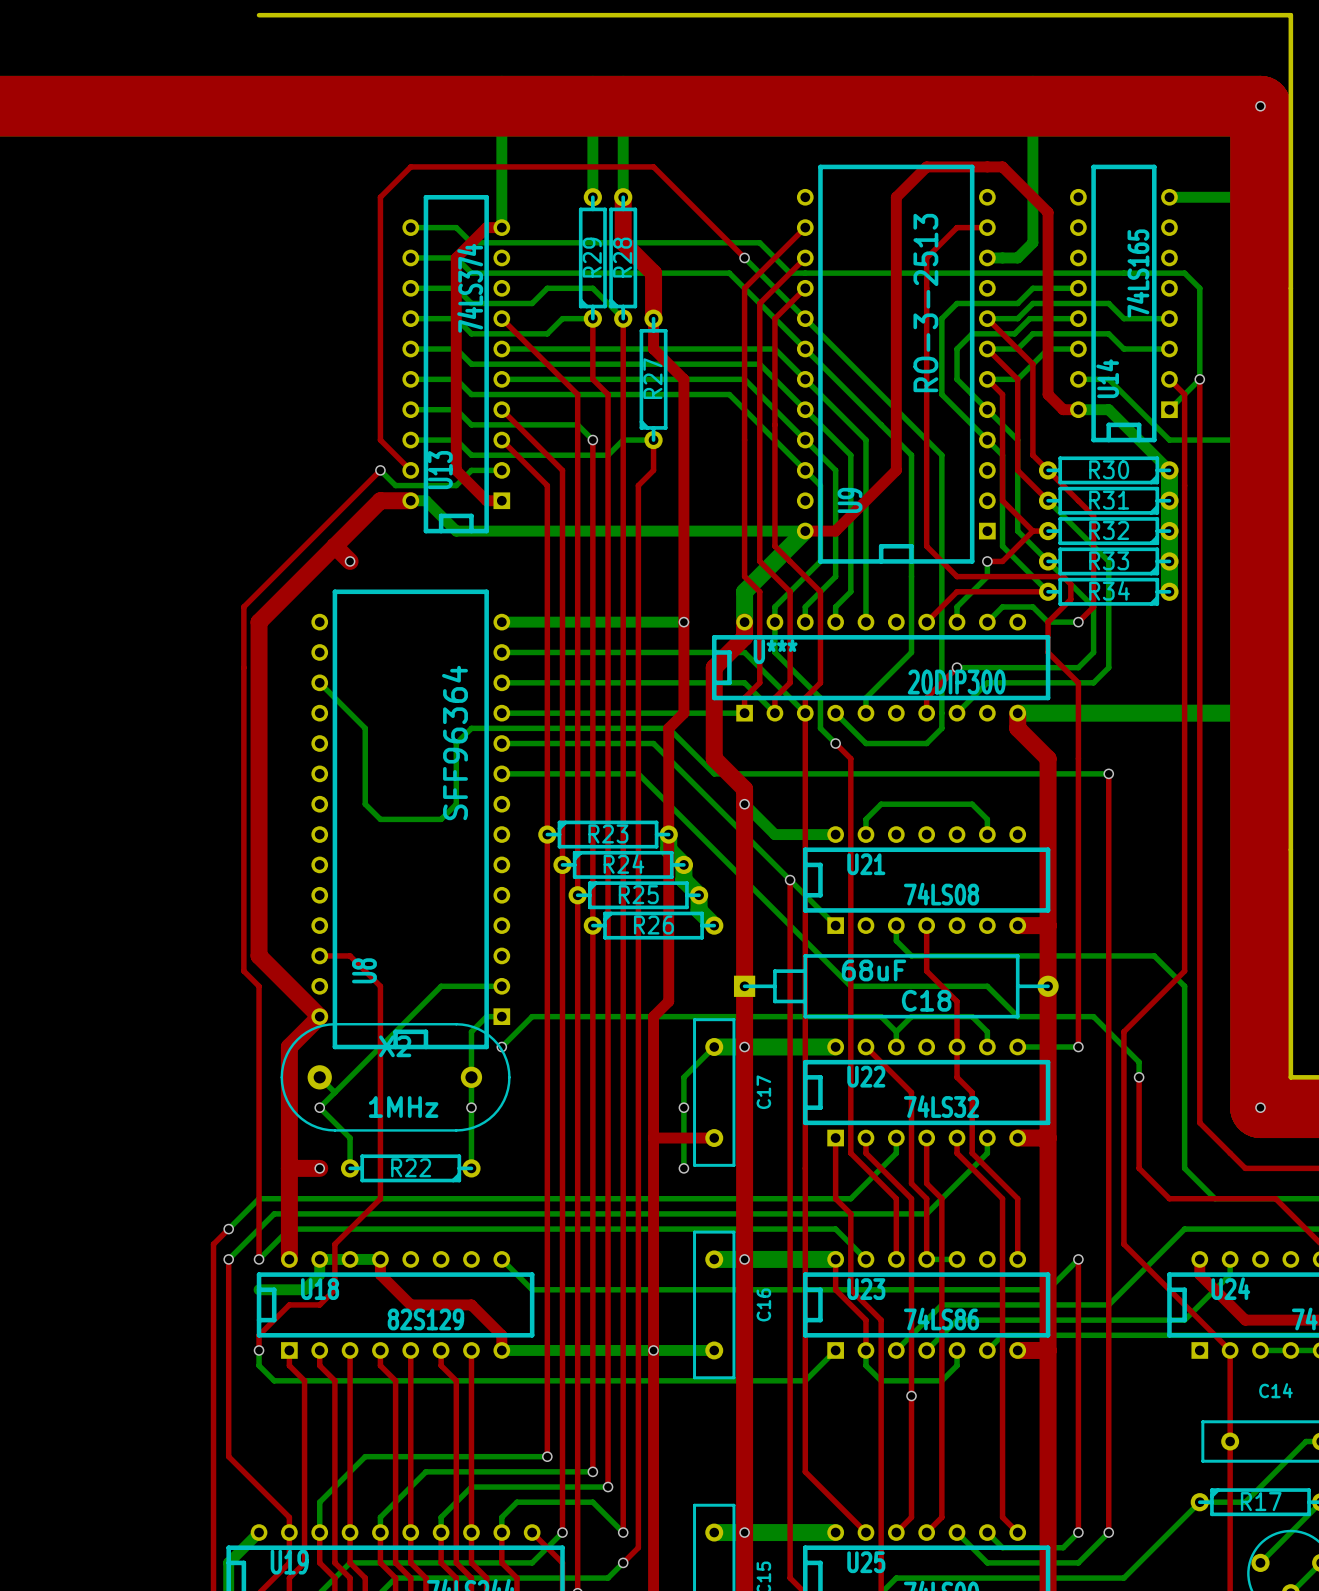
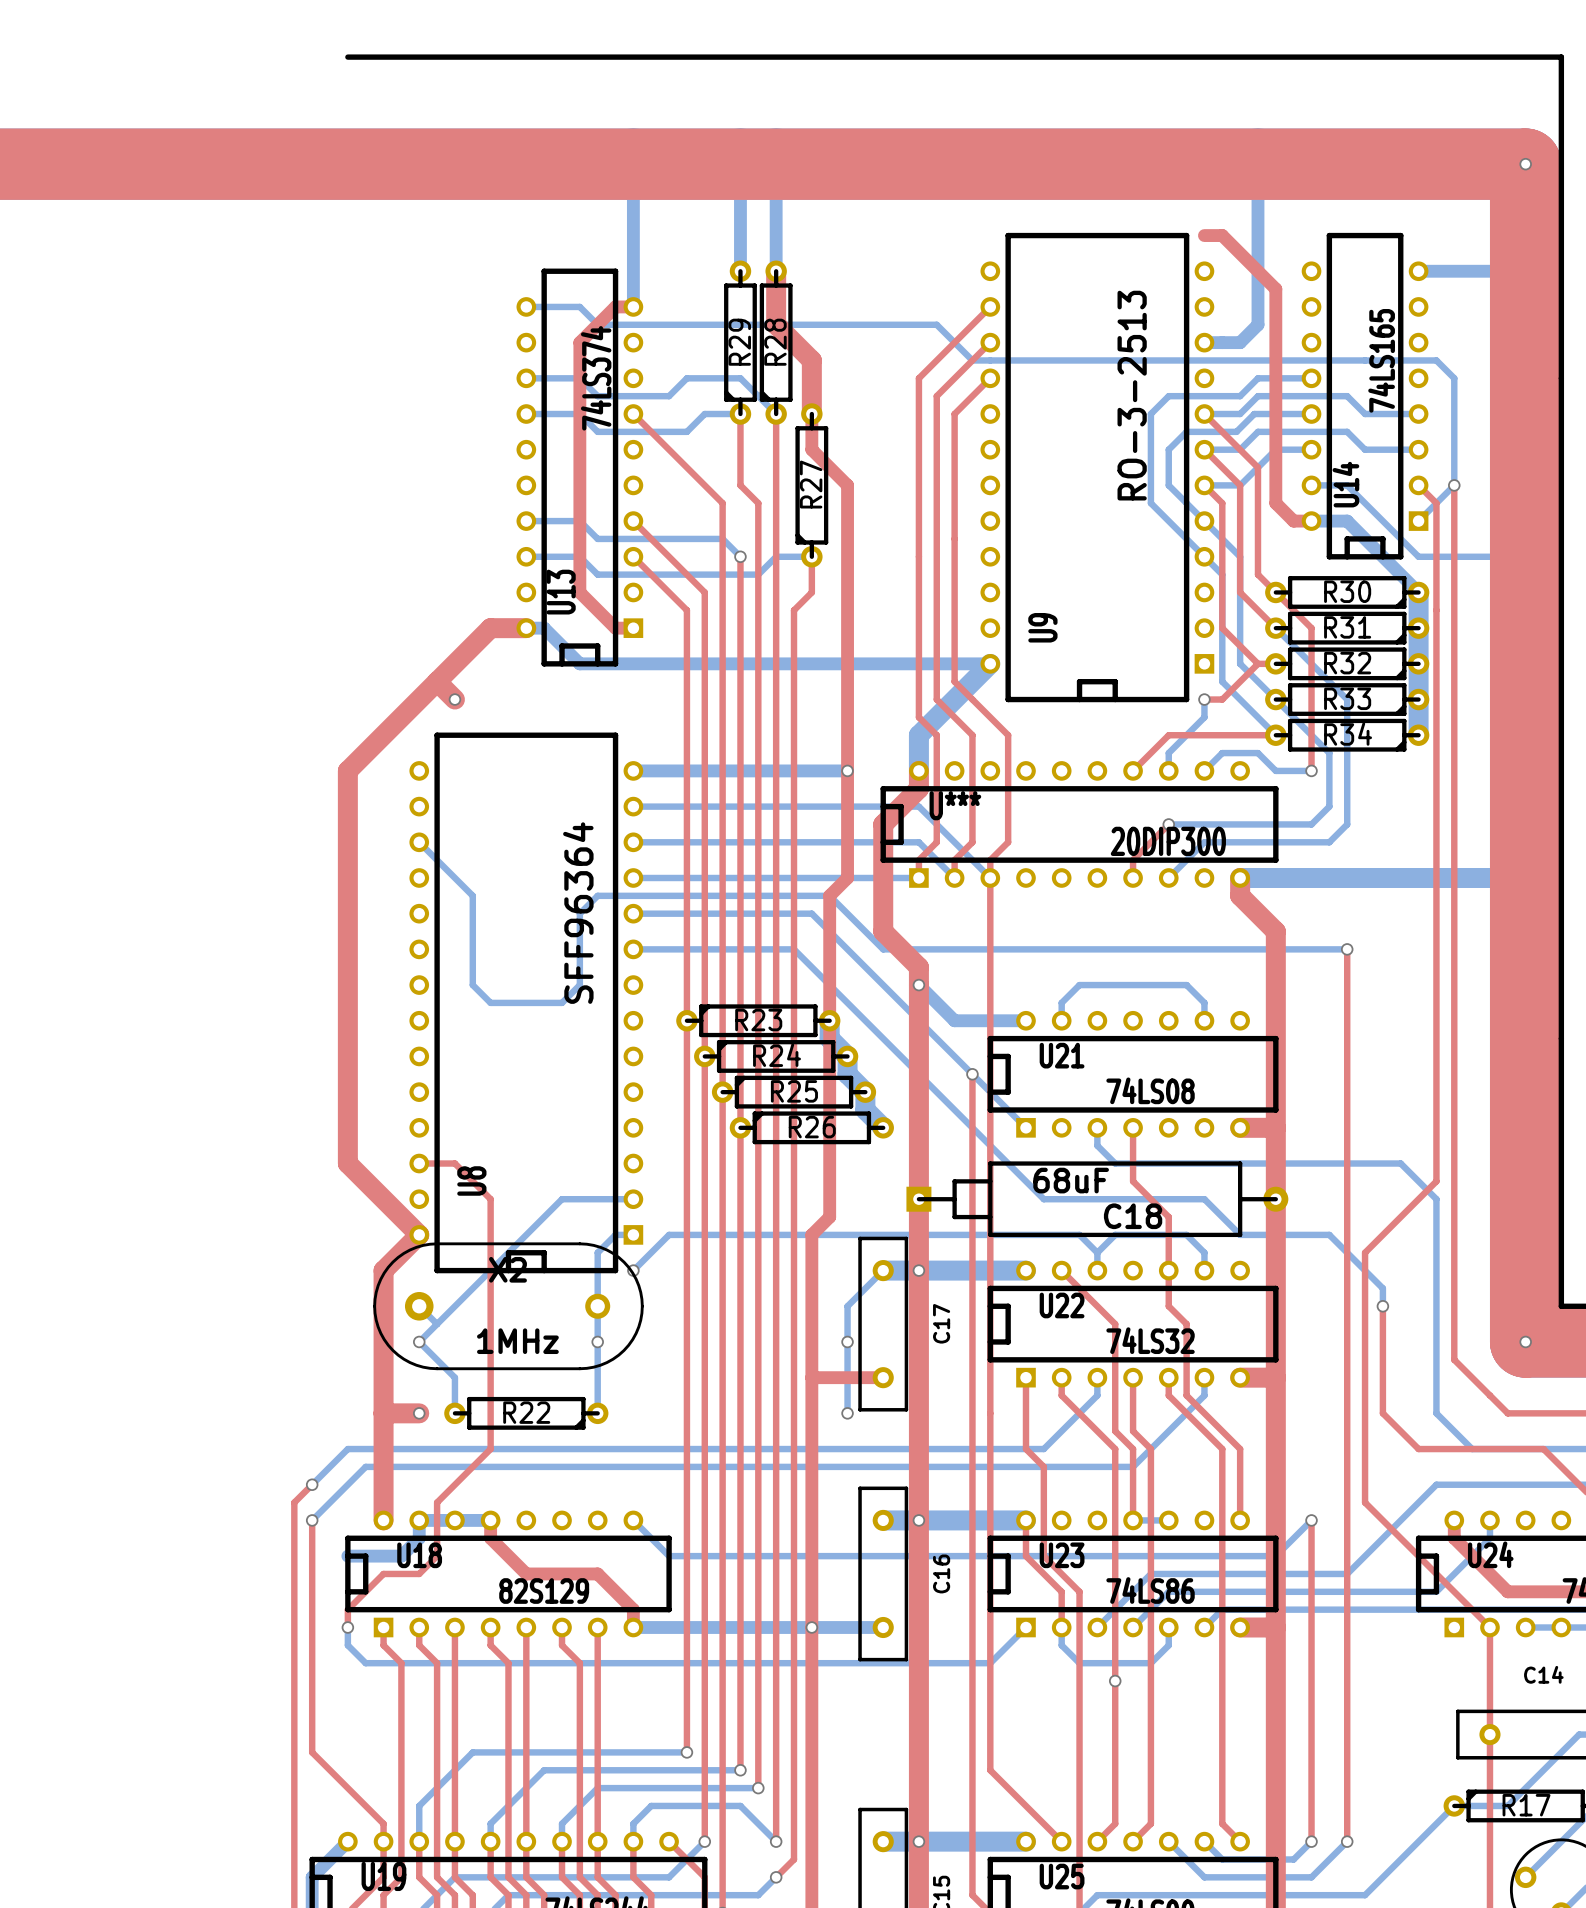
top track: (987, 166) (926, 166) (896, 197) (896, 470) (835, 531) (805, 531) -> none
top track: (987, 227) (957, 227) (926, 257) (926, 546) (957, 576) (1063, 576) (1070, 584) (1070, 599) (1048, 622) (1048, 652) (1078, 682) (1078, 1046) -> none
bottom track: (410, 257) (456, 257) (471, 273) (729, 273) (911, 455) (911, 652) (865, 698) (865, 713) -> none
top track: (744, 257) (653, 166) (410, 166) (380, 197) (380, 440) (410, 470) -> none
bottom track: (744, 257) (941, 455) (941, 728) (926, 743) (865, 743) (835, 713) -> none
via: (744, 257) -> none
bottom track: (410, 349) (456, 349) (471, 364) (759, 364) (850, 455) (850, 591) (835, 606) (835, 622) -> none
bottom track: (501, 349) (774, 349) (865, 440) (865, 622) -> none
bottom track: (410, 379) (456, 379) (471, 394) (729, 394) (820, 485) (820, 561) (774, 606) (774, 652) (820, 698) (820, 728) (835, 743) -> none
bottom track: (501, 379) (744, 379) (835, 470) (835, 576) (805, 606) (805, 622) -> none
top track: (380, 470) (243, 606) (243, 971) (259, 986) (259, 1259) -> none
bottom track: (380, 470) (395, 485) (456, 485) (471, 470) (501, 470) -> none
via: (380, 470) -> none
top track: (1078, 500) (1093, 515) (1093, 606) (1078, 622) -> (1311, 628) (1311, 770)
top track: (835, 743) (850, 758) (850, 1153) (896, 1198) (896, 1259) -> none
via: (835, 743) -> none
bottom track: (1017, 1046) (1078, 1046) -> none
via: (1078, 1046) -> none
bottom track: (259, 1259) (289, 1229) (835, 1229) (865, 1259) -> none
via: (259, 1259) -> none

